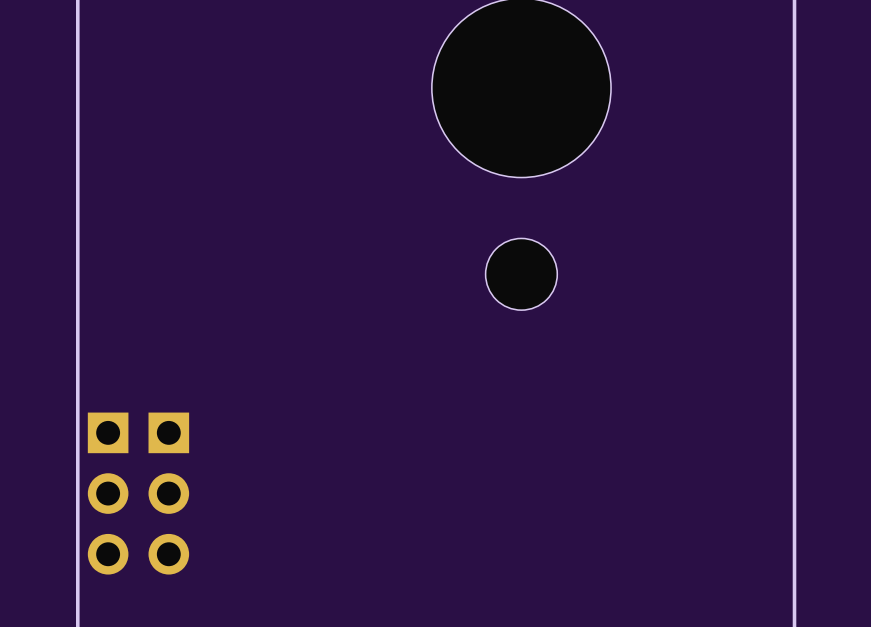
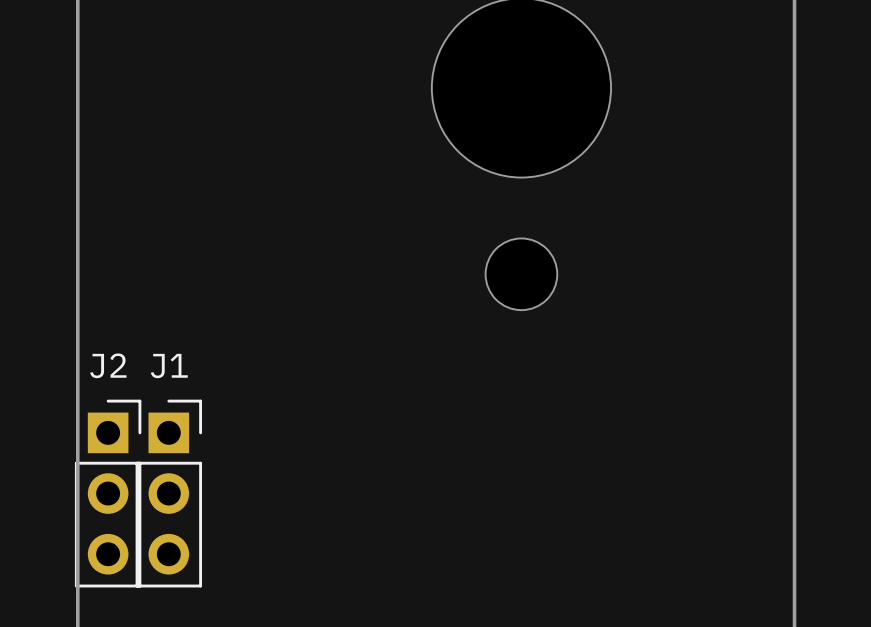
J2 side: top (108, 493) -> bottom (108, 493)
J1 side: top (168, 493) -> bottom (168, 493)

